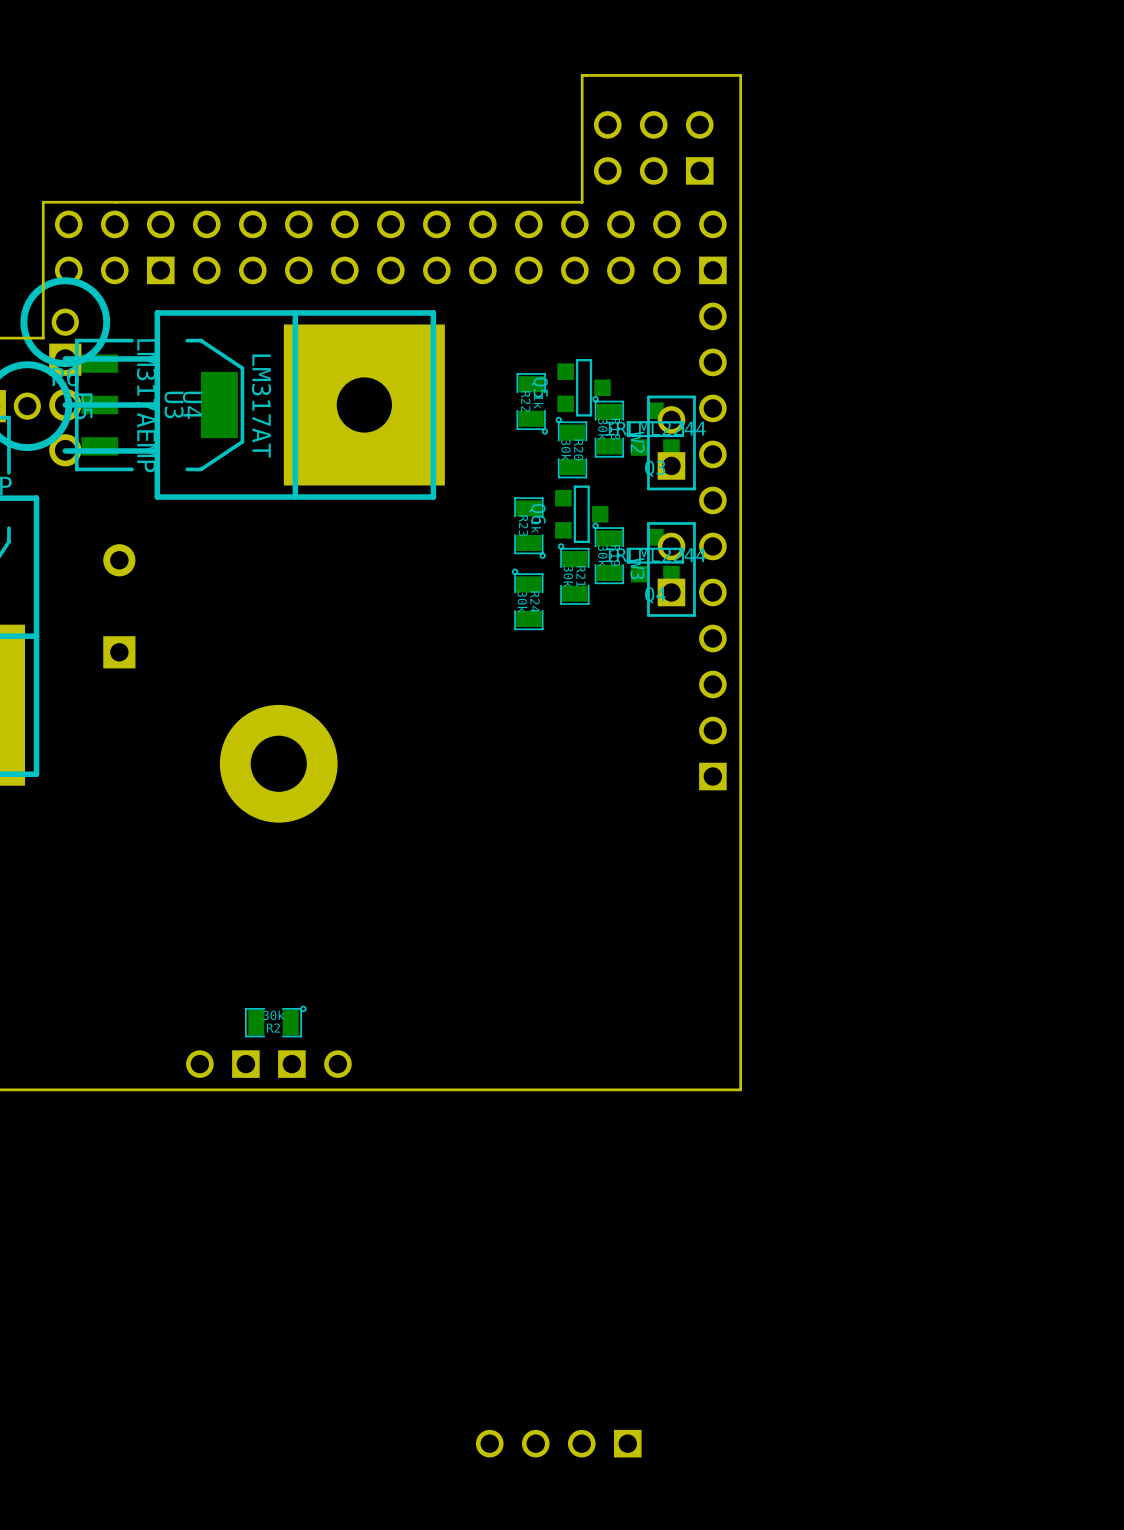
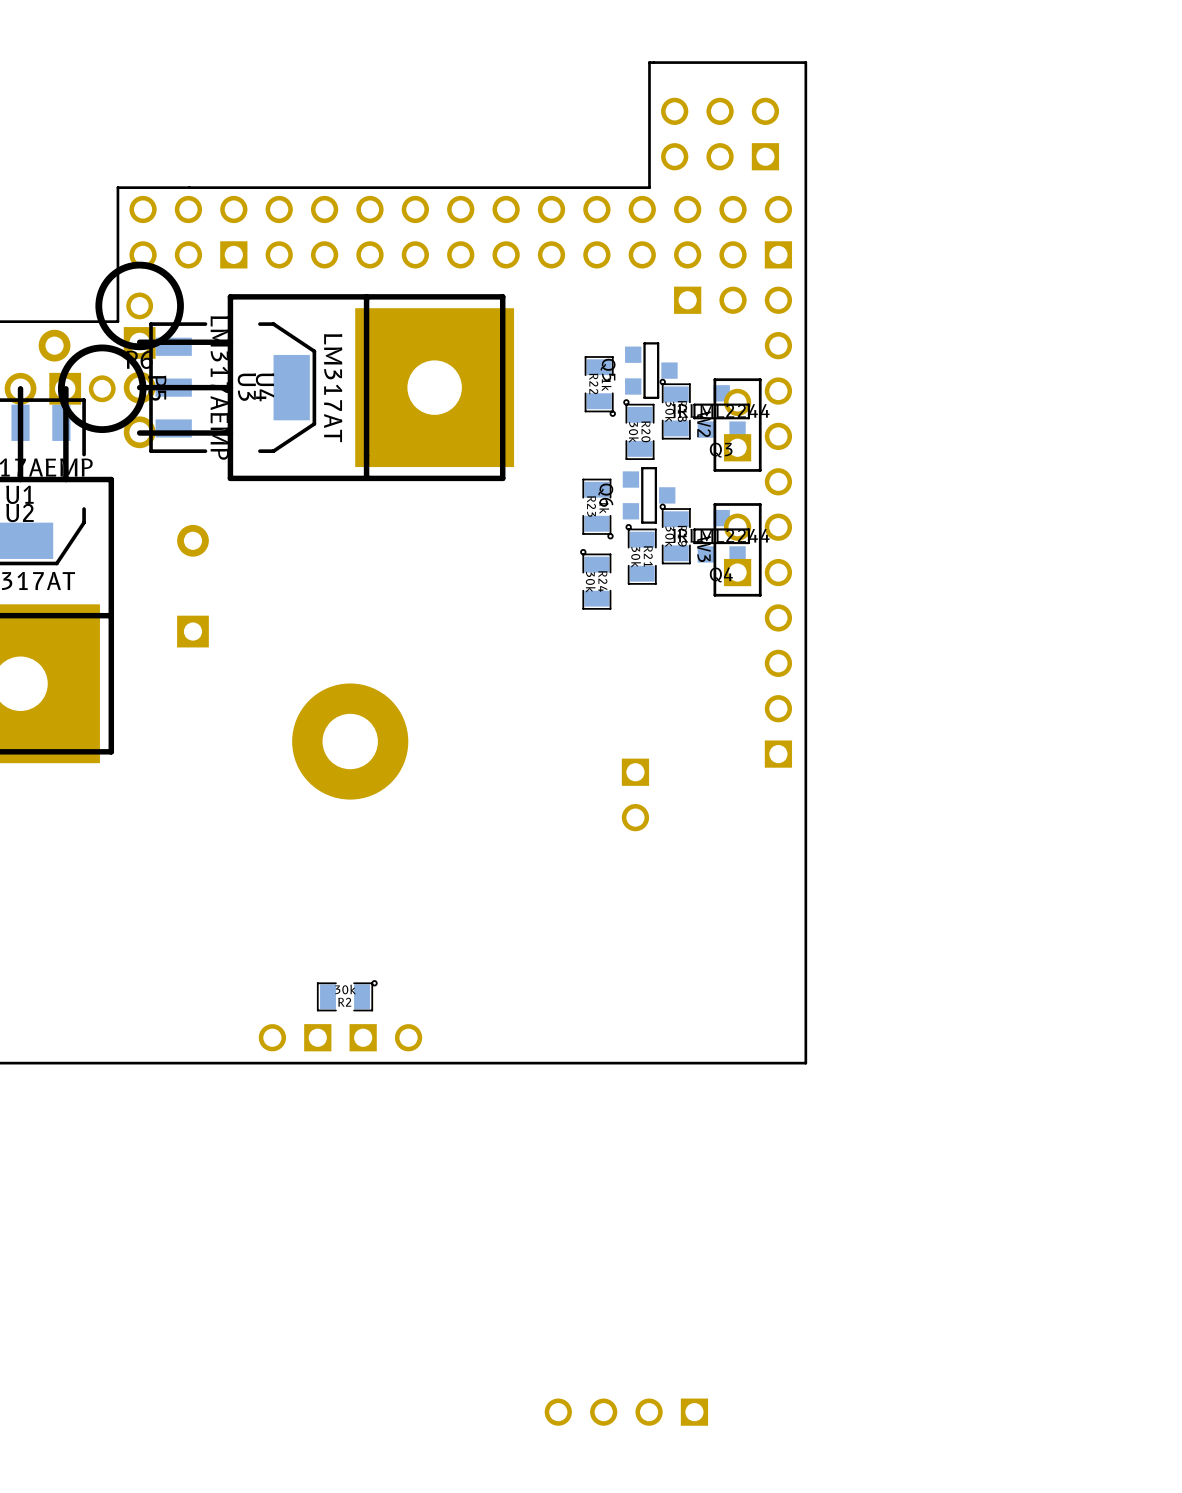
part: none -> (710, 300)
part: none -> (635, 794)

